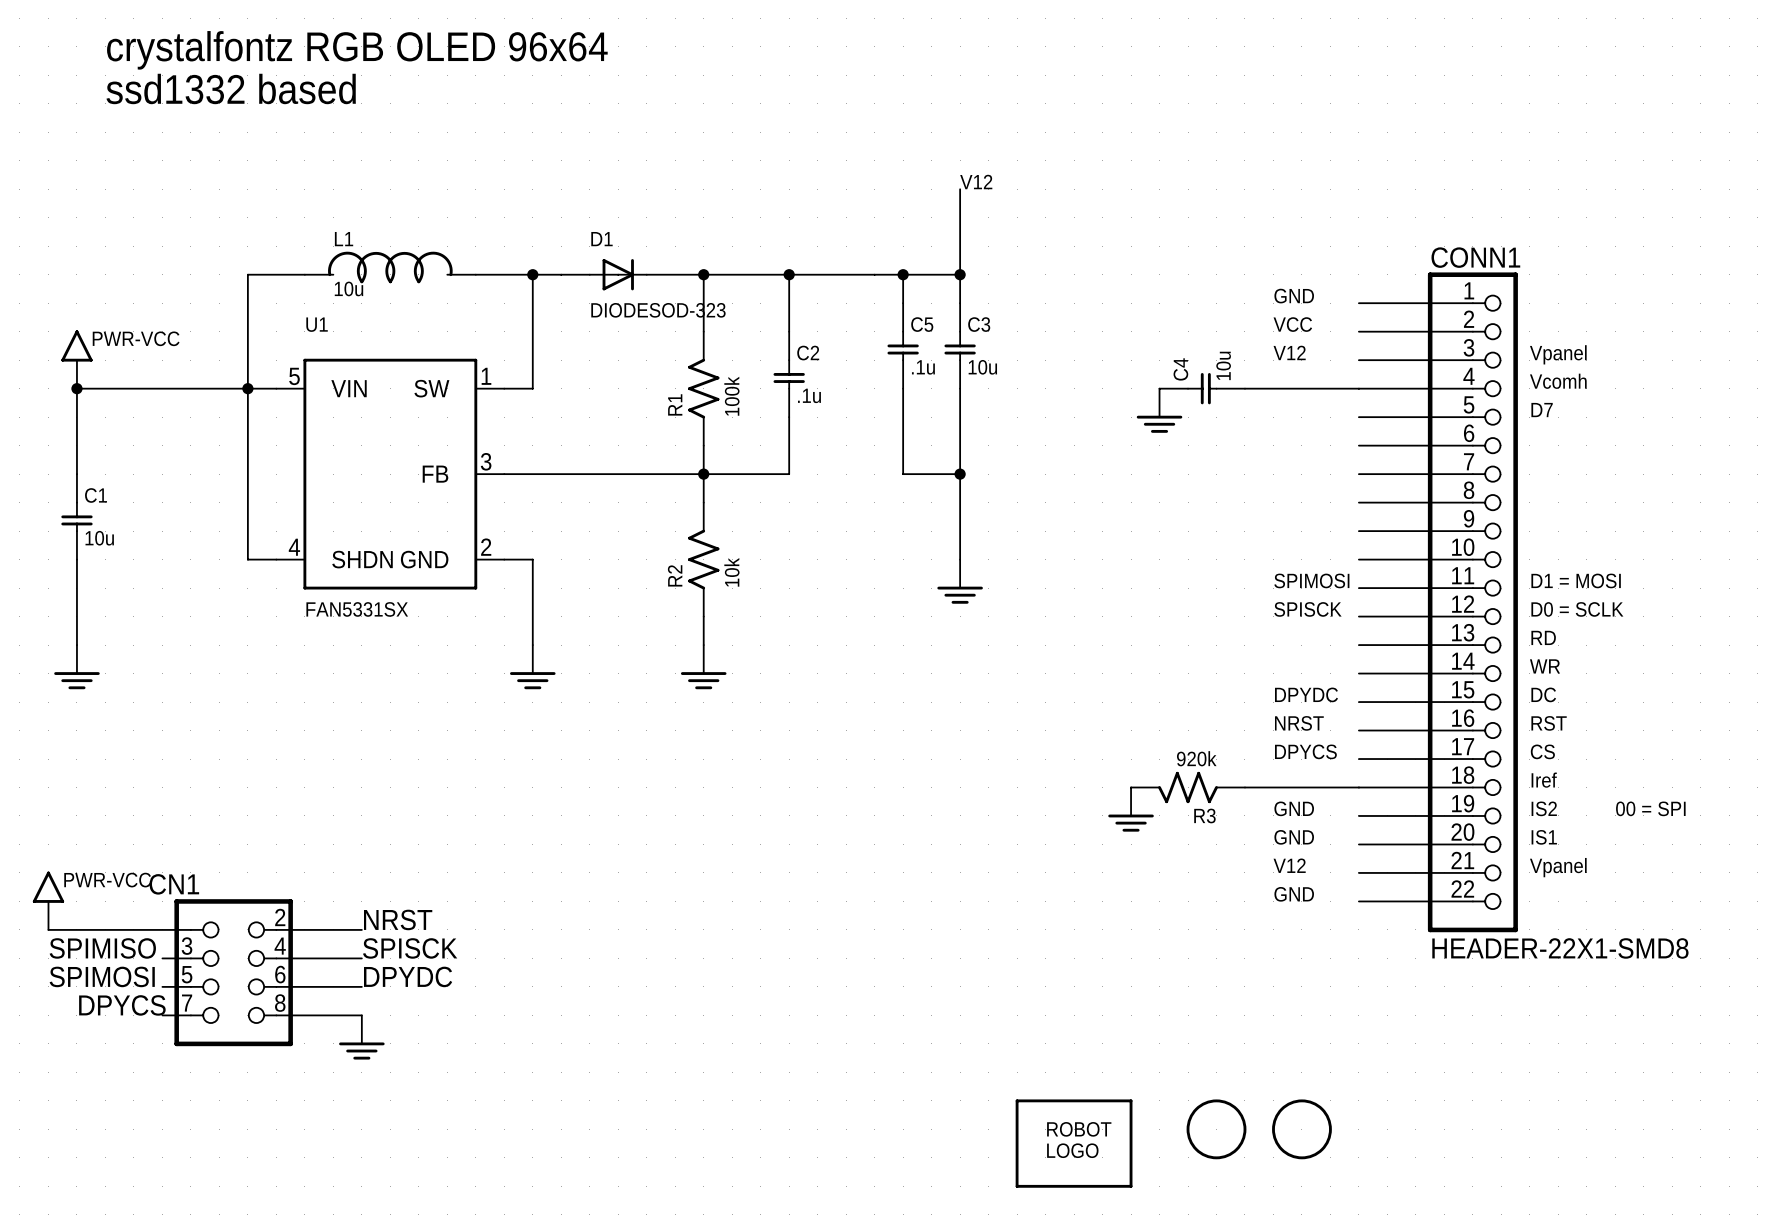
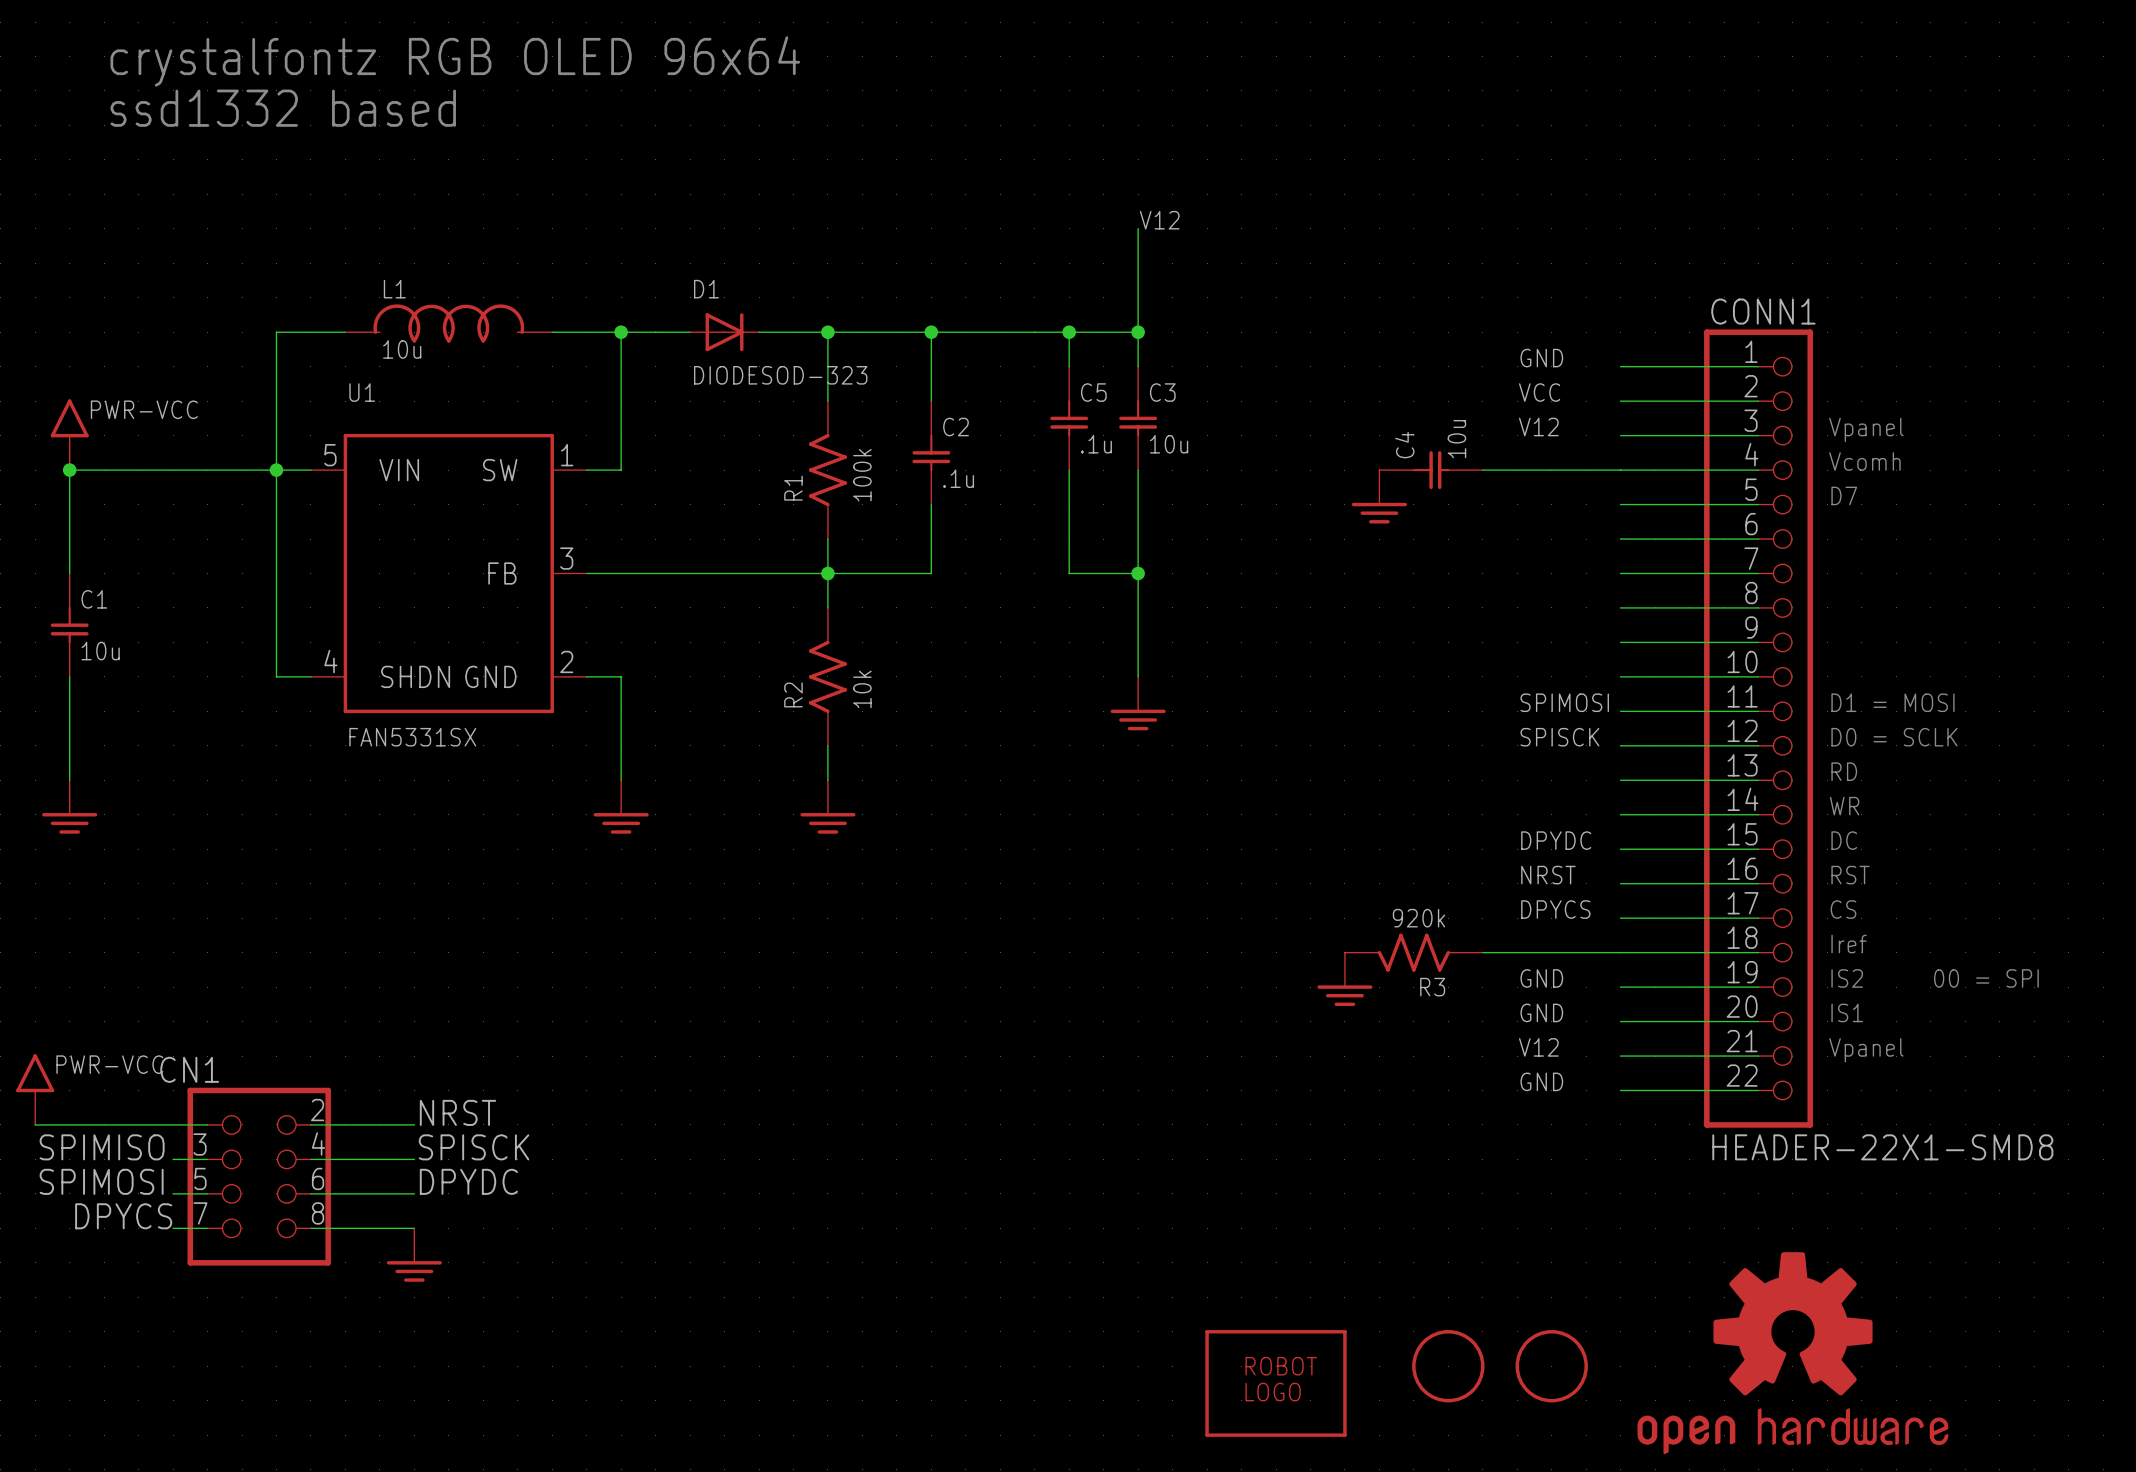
part: none -> (1792, 1353)

